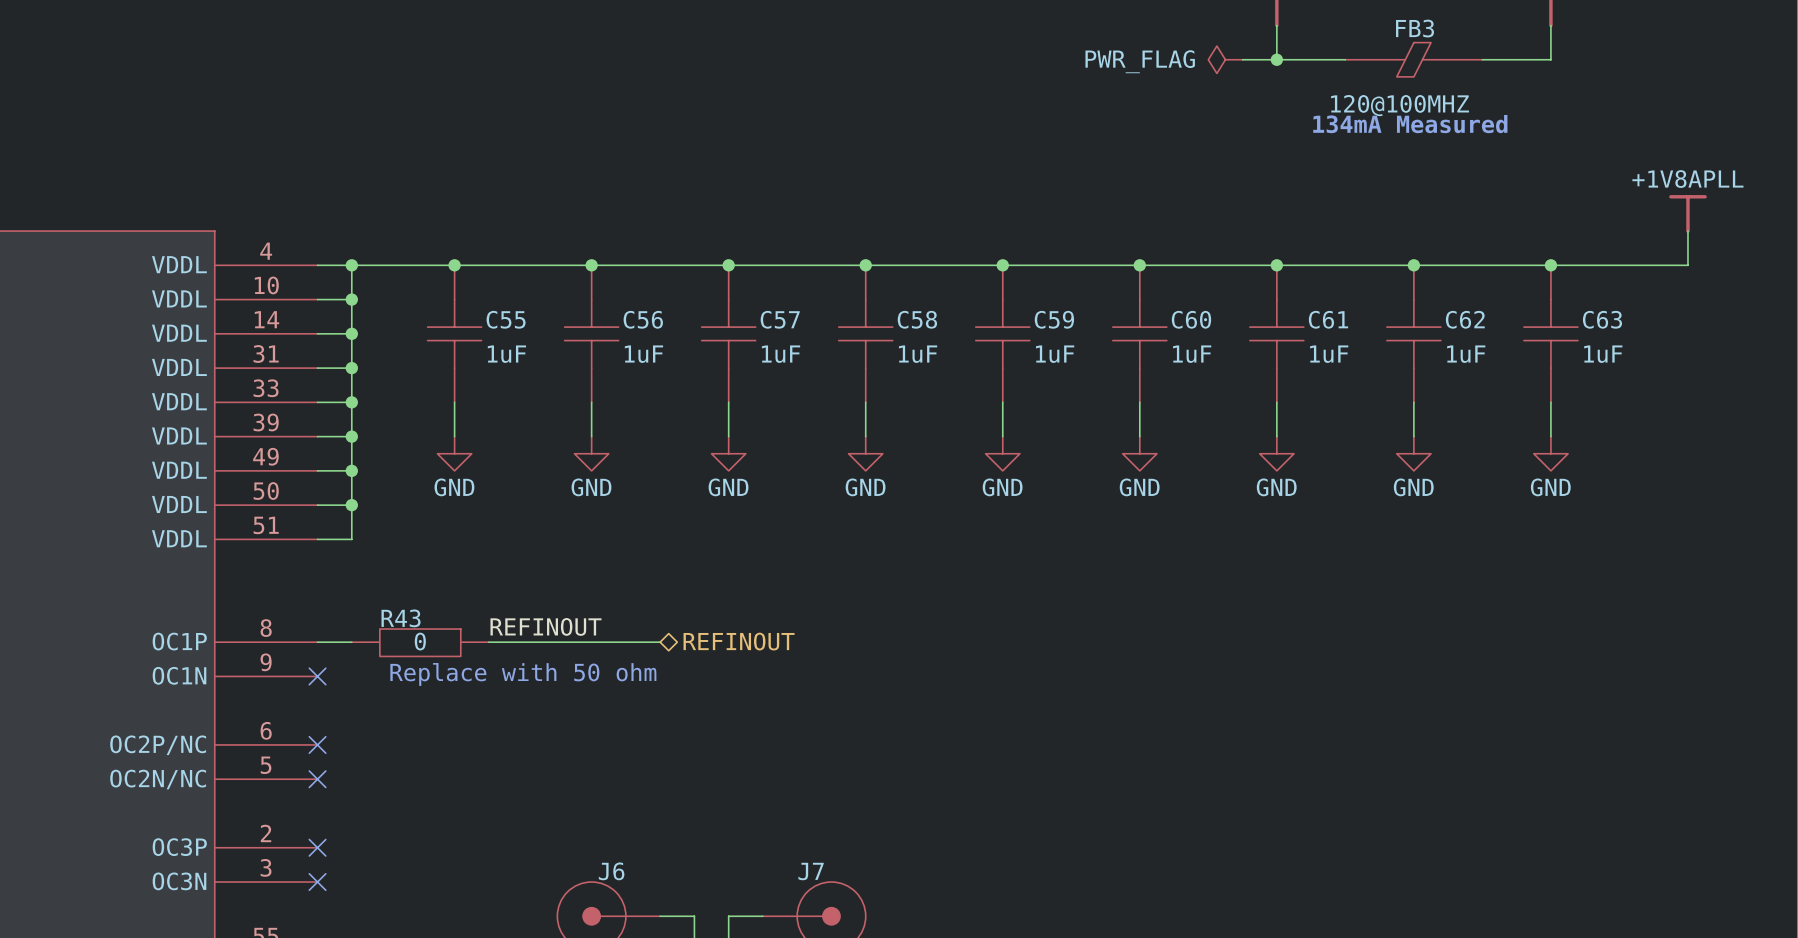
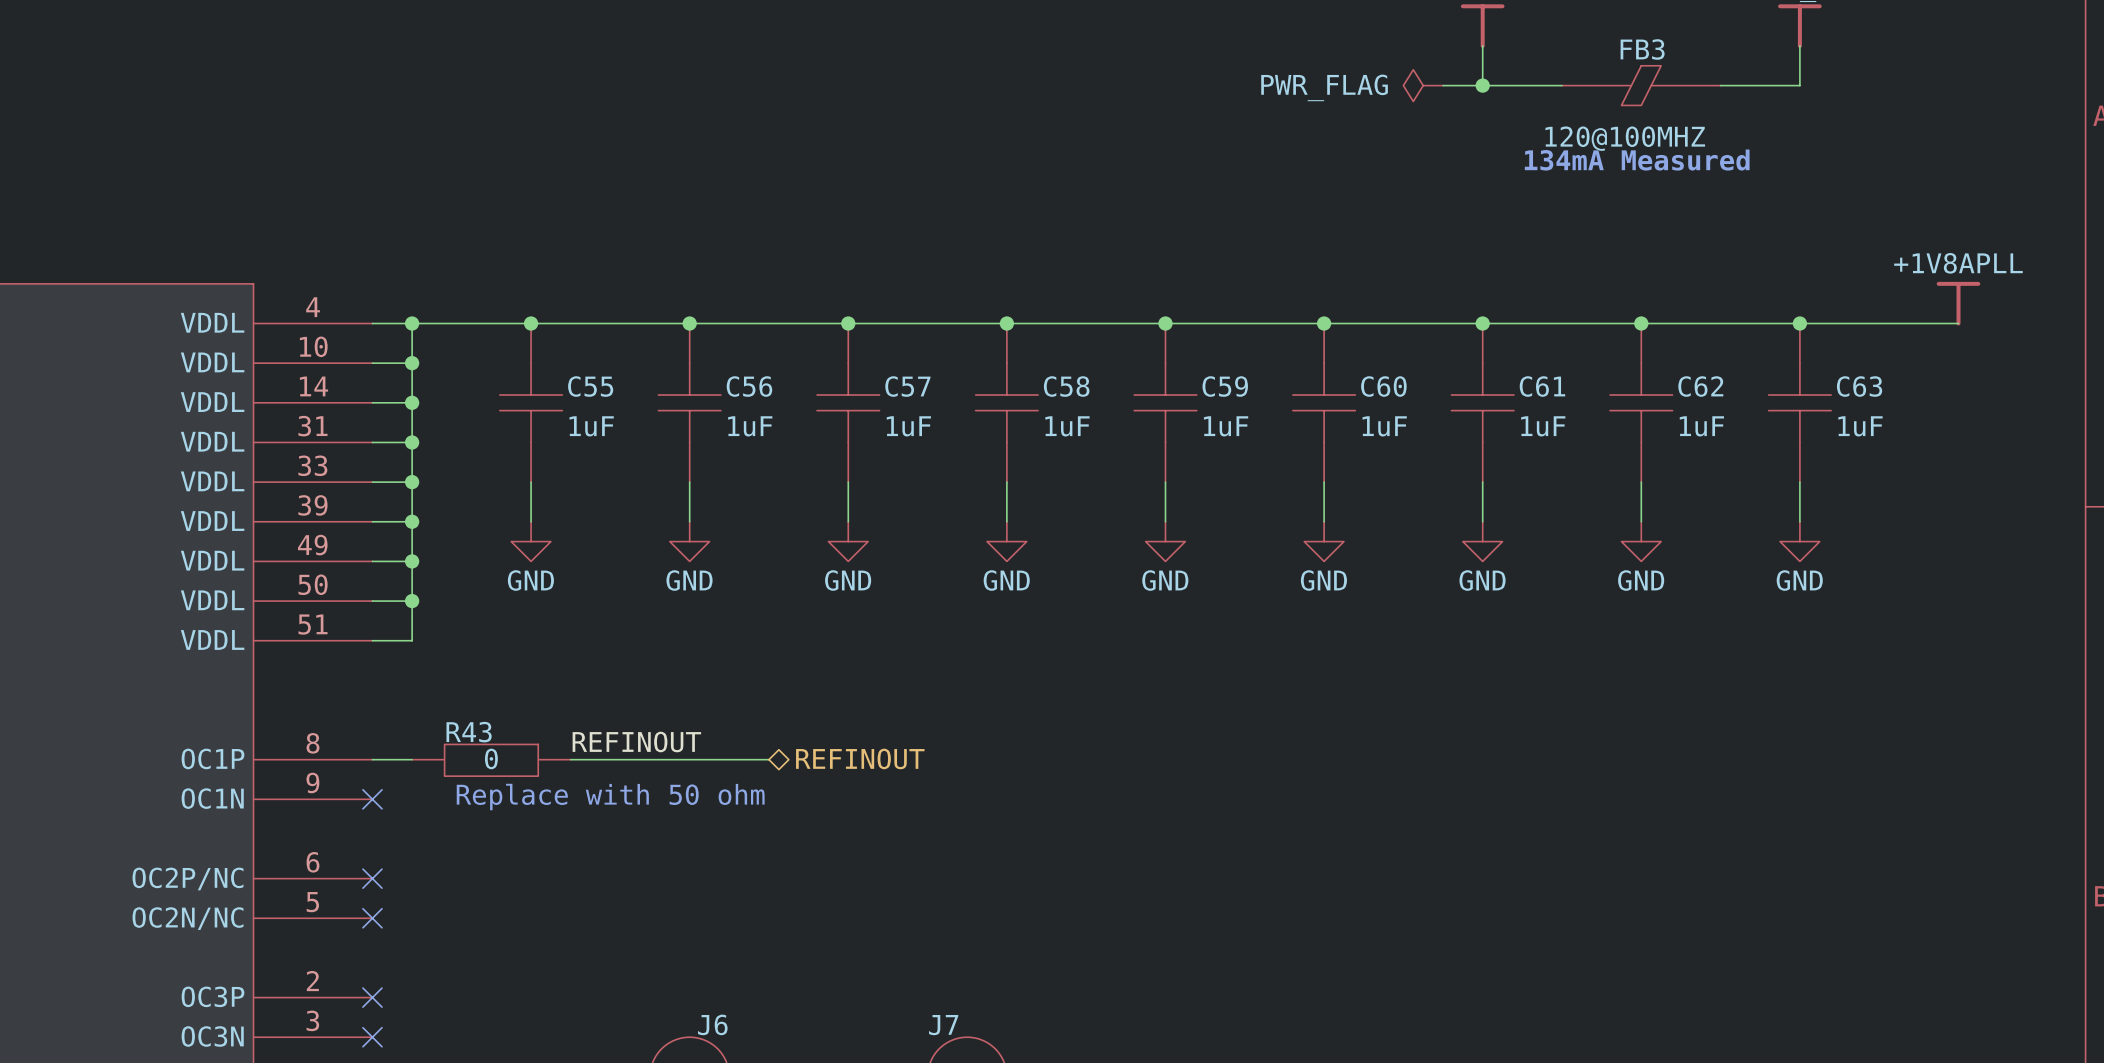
power symbol position: +1V8APLL (1687, 213) -> +1V8APLL (1958, 303)

